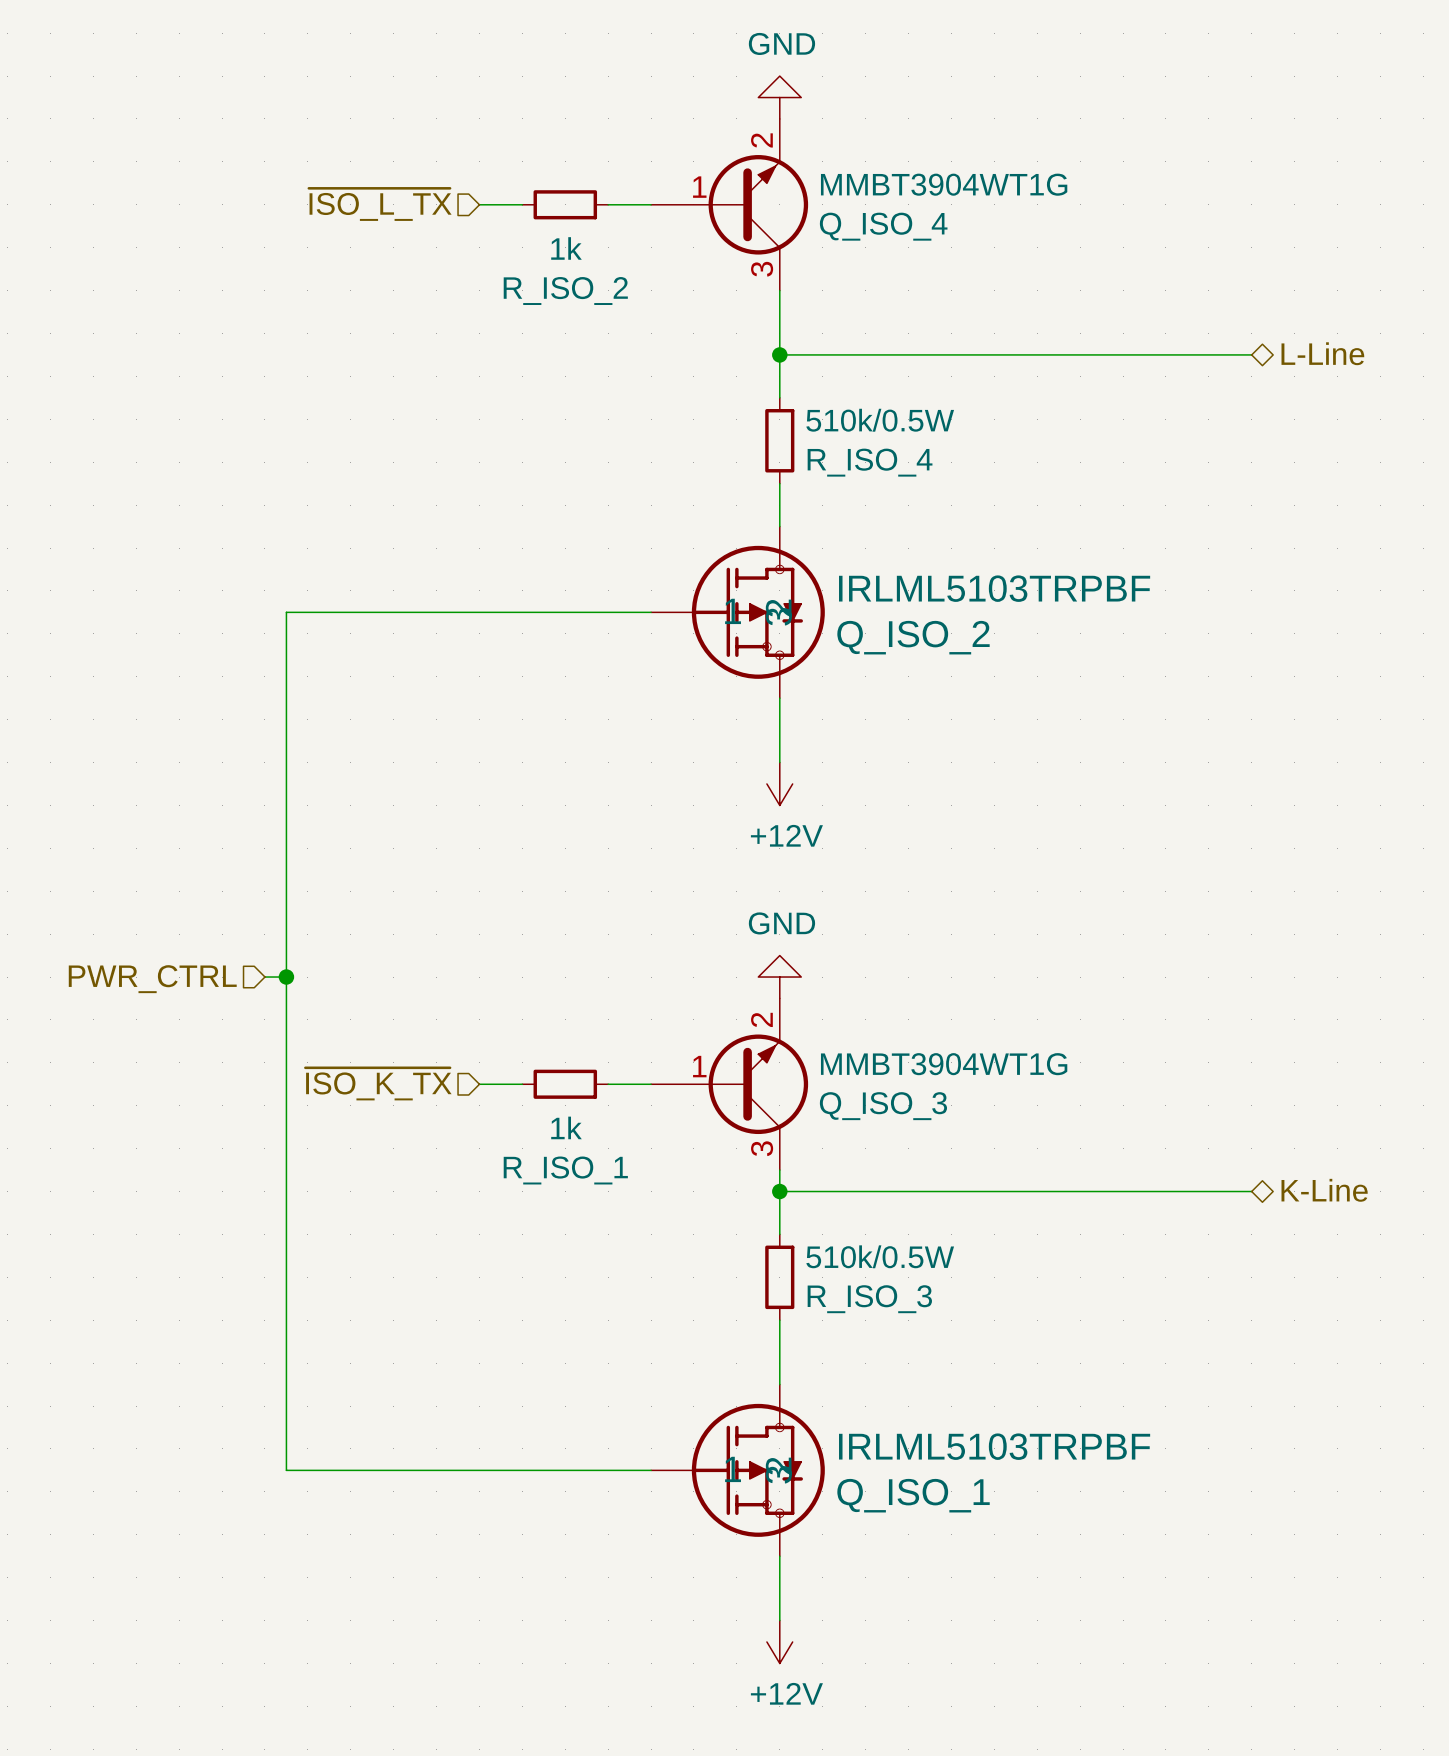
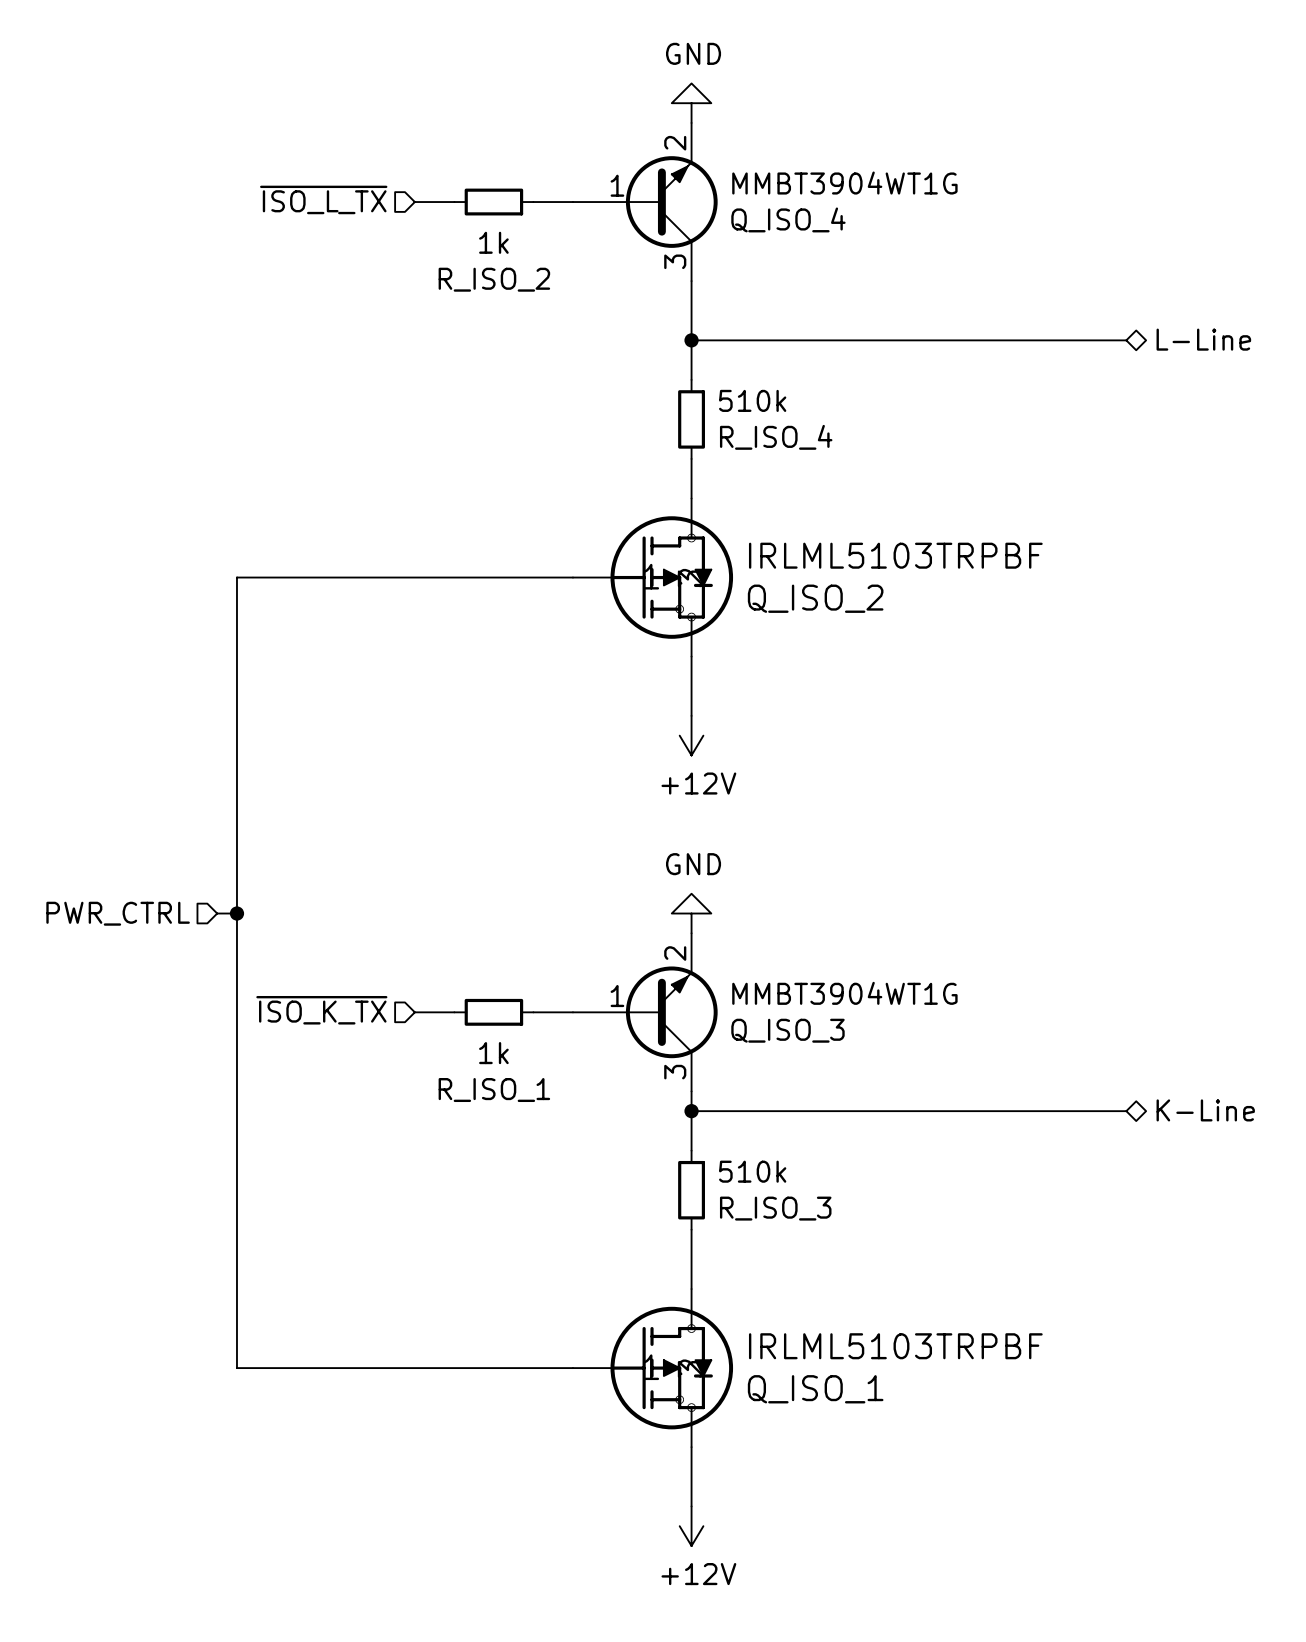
R_ISO_4 value: 510k/0.5W (880, 420) -> 510k (752, 400)
R_ISO_3 value: 510k/0.5W (880, 1256) -> 510k (752, 1171)

